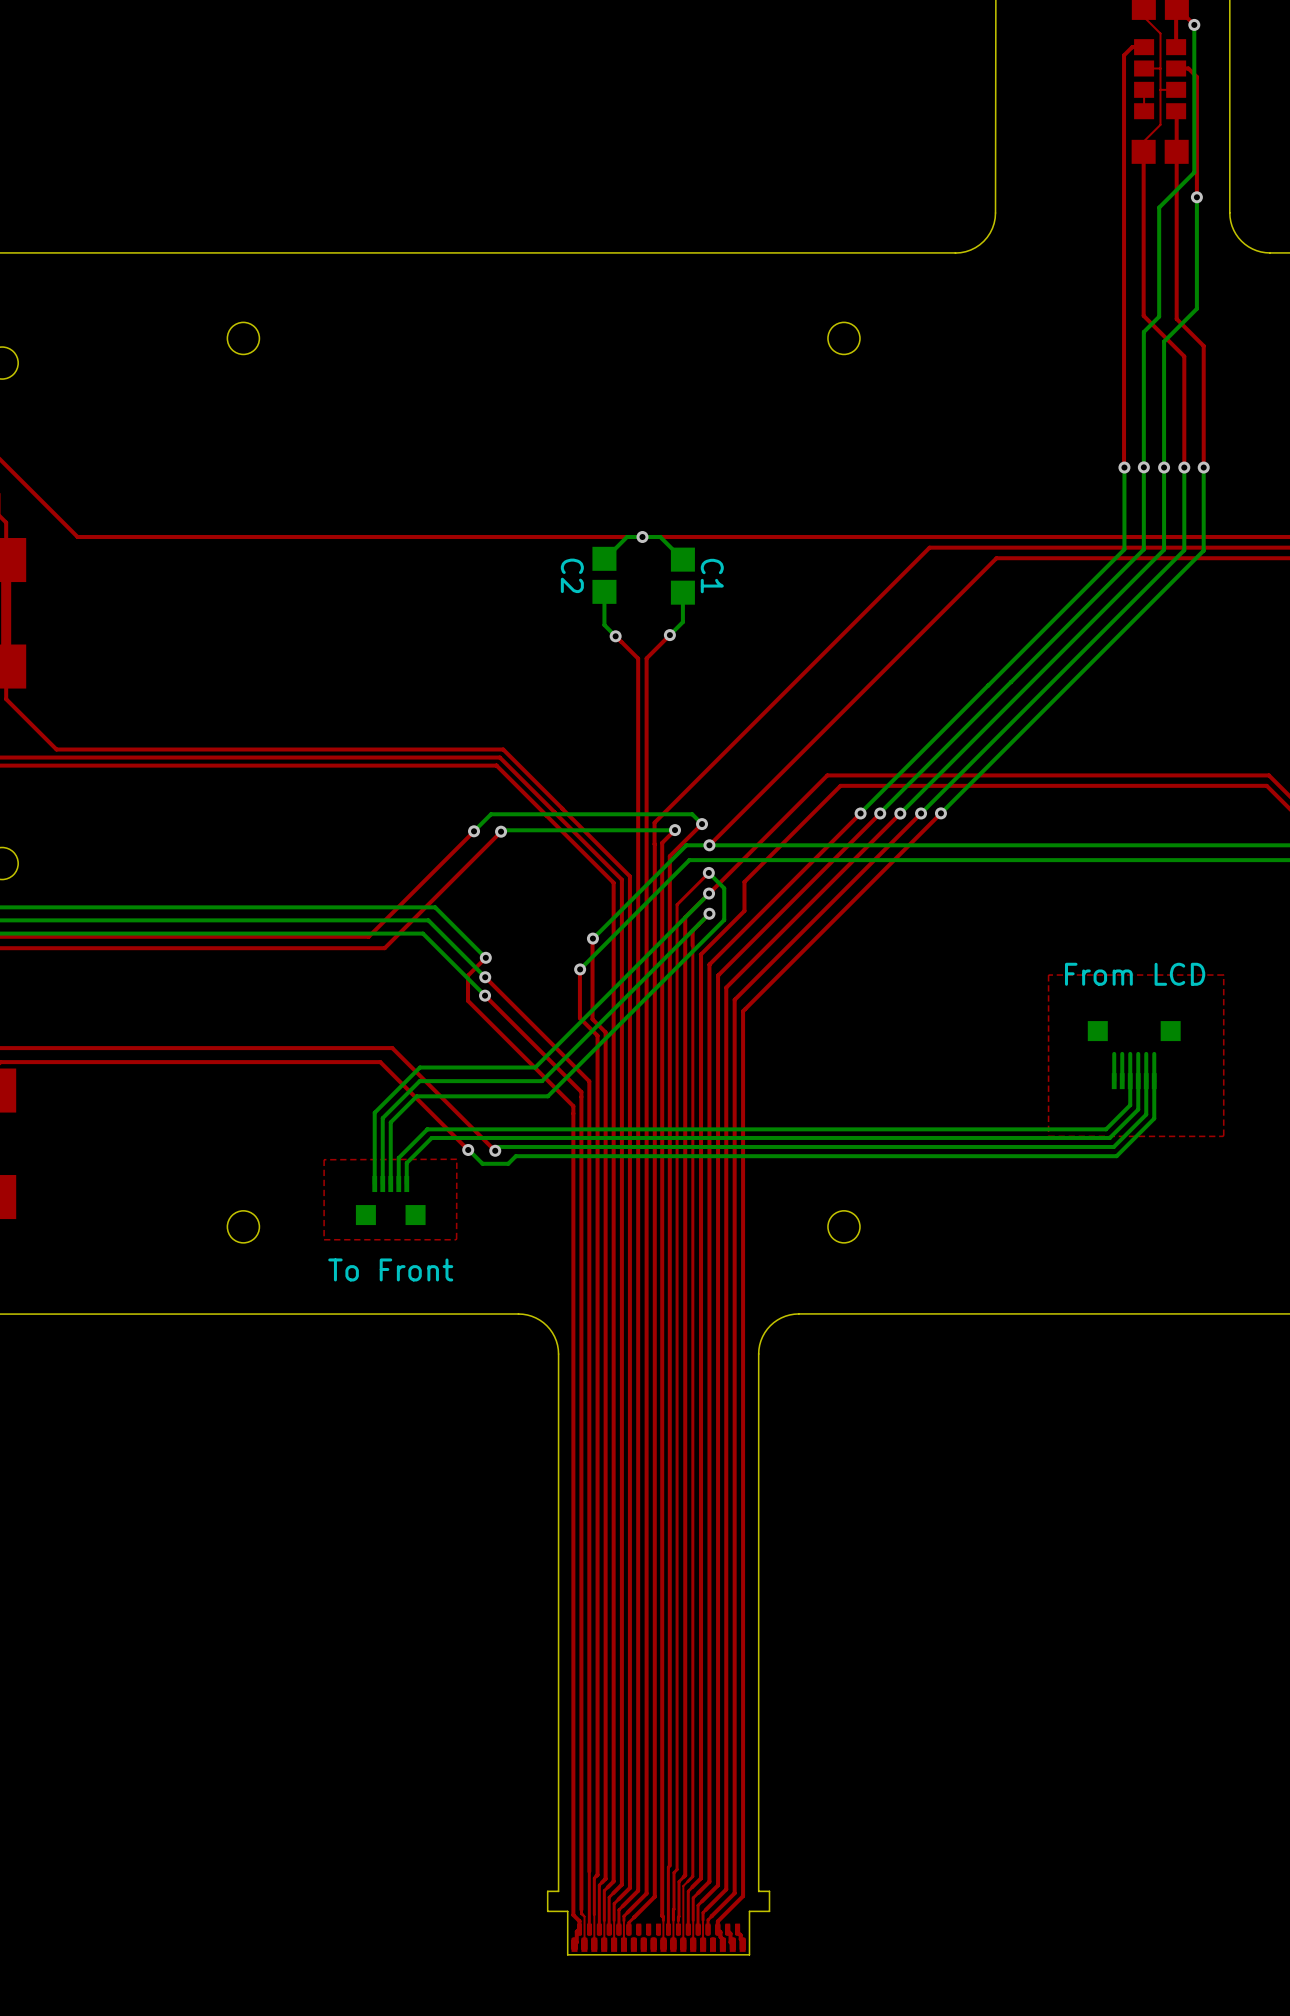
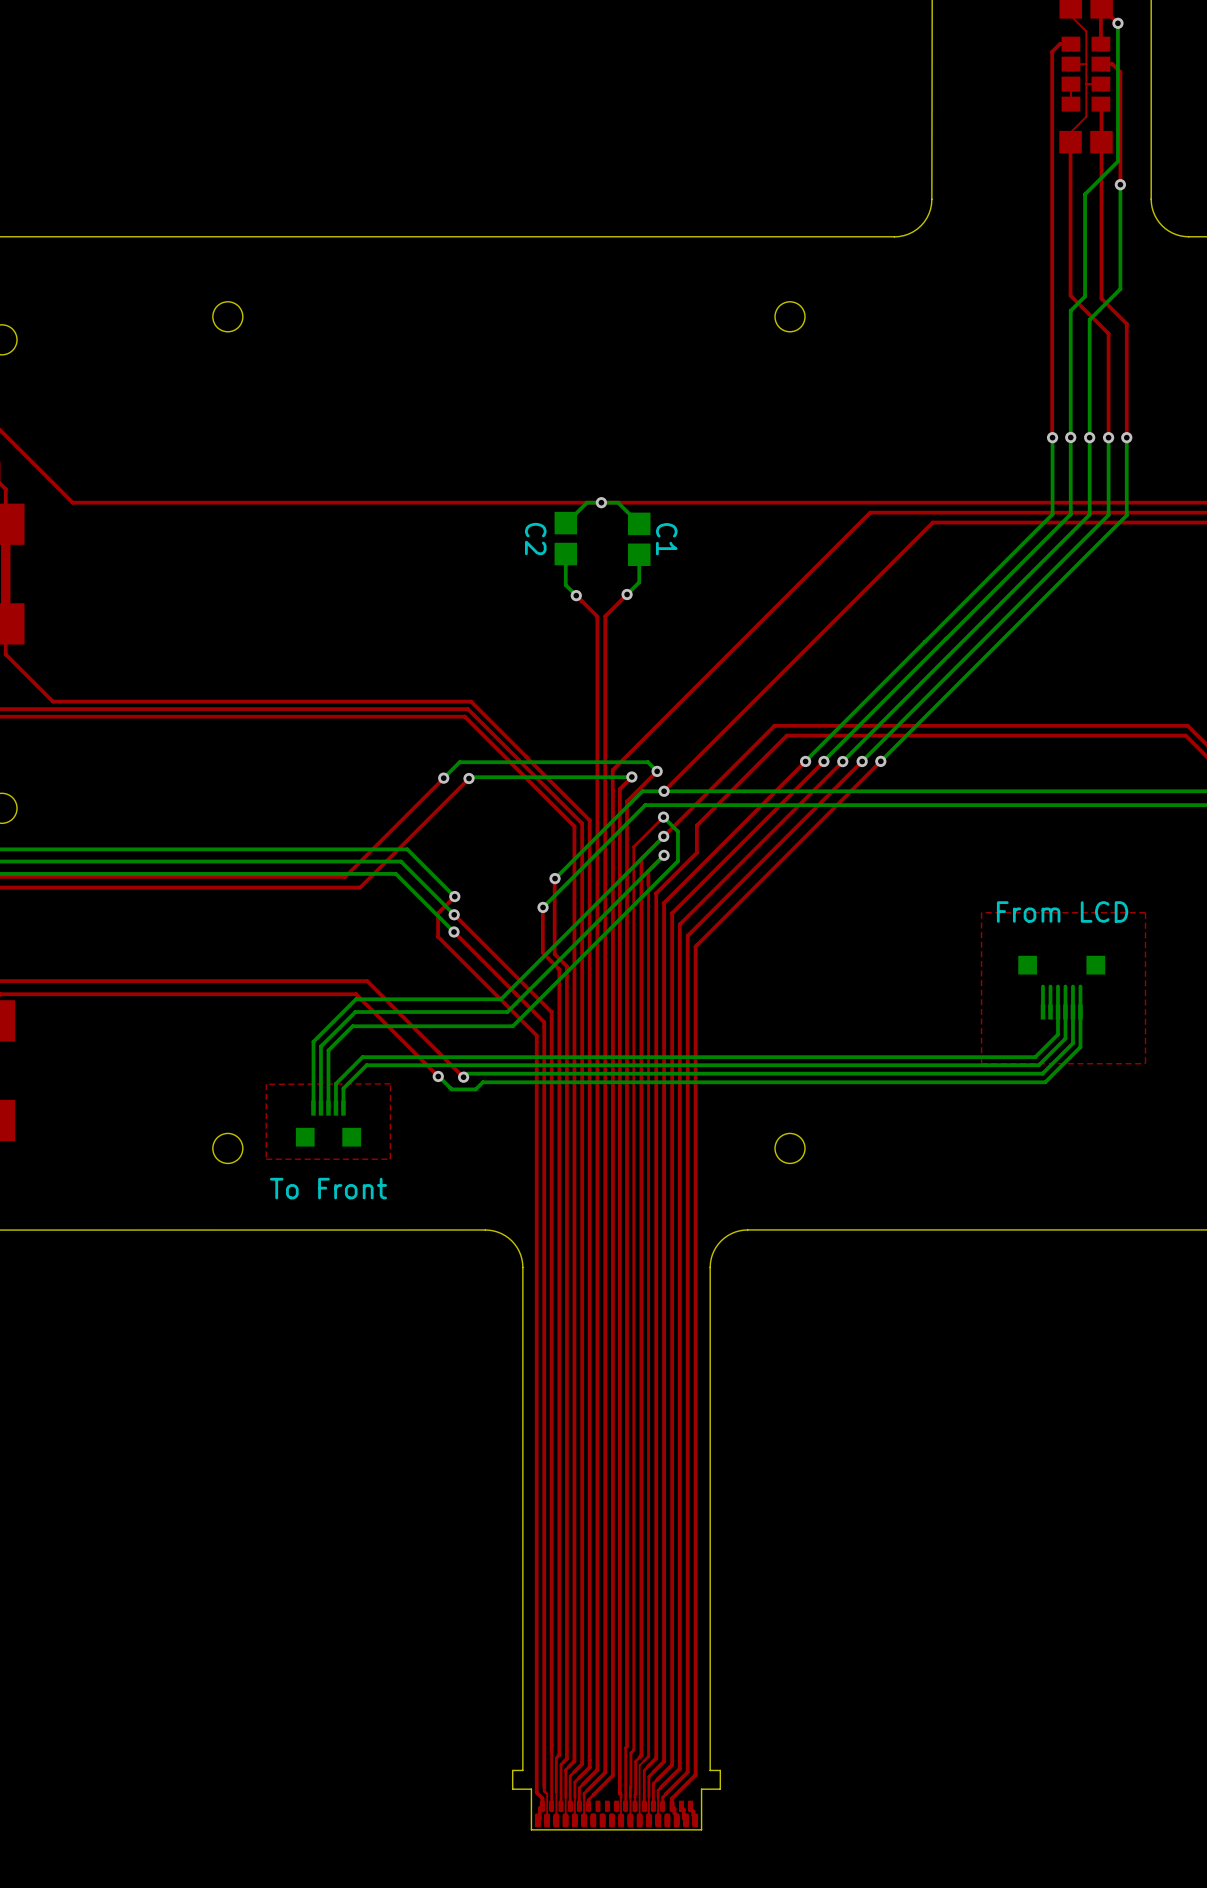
bottom track: (419, 1067) (374, 1112) (374, 1184) -> (393, 999) (356, 999) (313, 1041) (313, 1108)
bottom track: (419, 1081) (382, 1118) (382, 1184) -> (392, 1012) (355, 1012) (320, 1046) (320, 1108)
bottom track: (416, 1096) (390, 1122) (390, 1184) -> (390, 1026) (352, 1026) (328, 1050) (328, 1108)
bottom track: (427, 1129) (398, 1158) (398, 1184) -> (400, 1057) (362, 1057) (335, 1083) (335, 1108)
bottom track: (431, 1137) (406, 1163) (406, 1184) -> (404, 1065) (366, 1065) (343, 1088) (343, 1108)
top zone outline: (456, 1159) (456, 1239) (324, 1239) (324, 1159) (456, 1159) -> (390, 1083) (389, 1159) (266, 1159) (266, 1084) (390, 1083)
part position: (390, 1200) -> (328, 1123)

